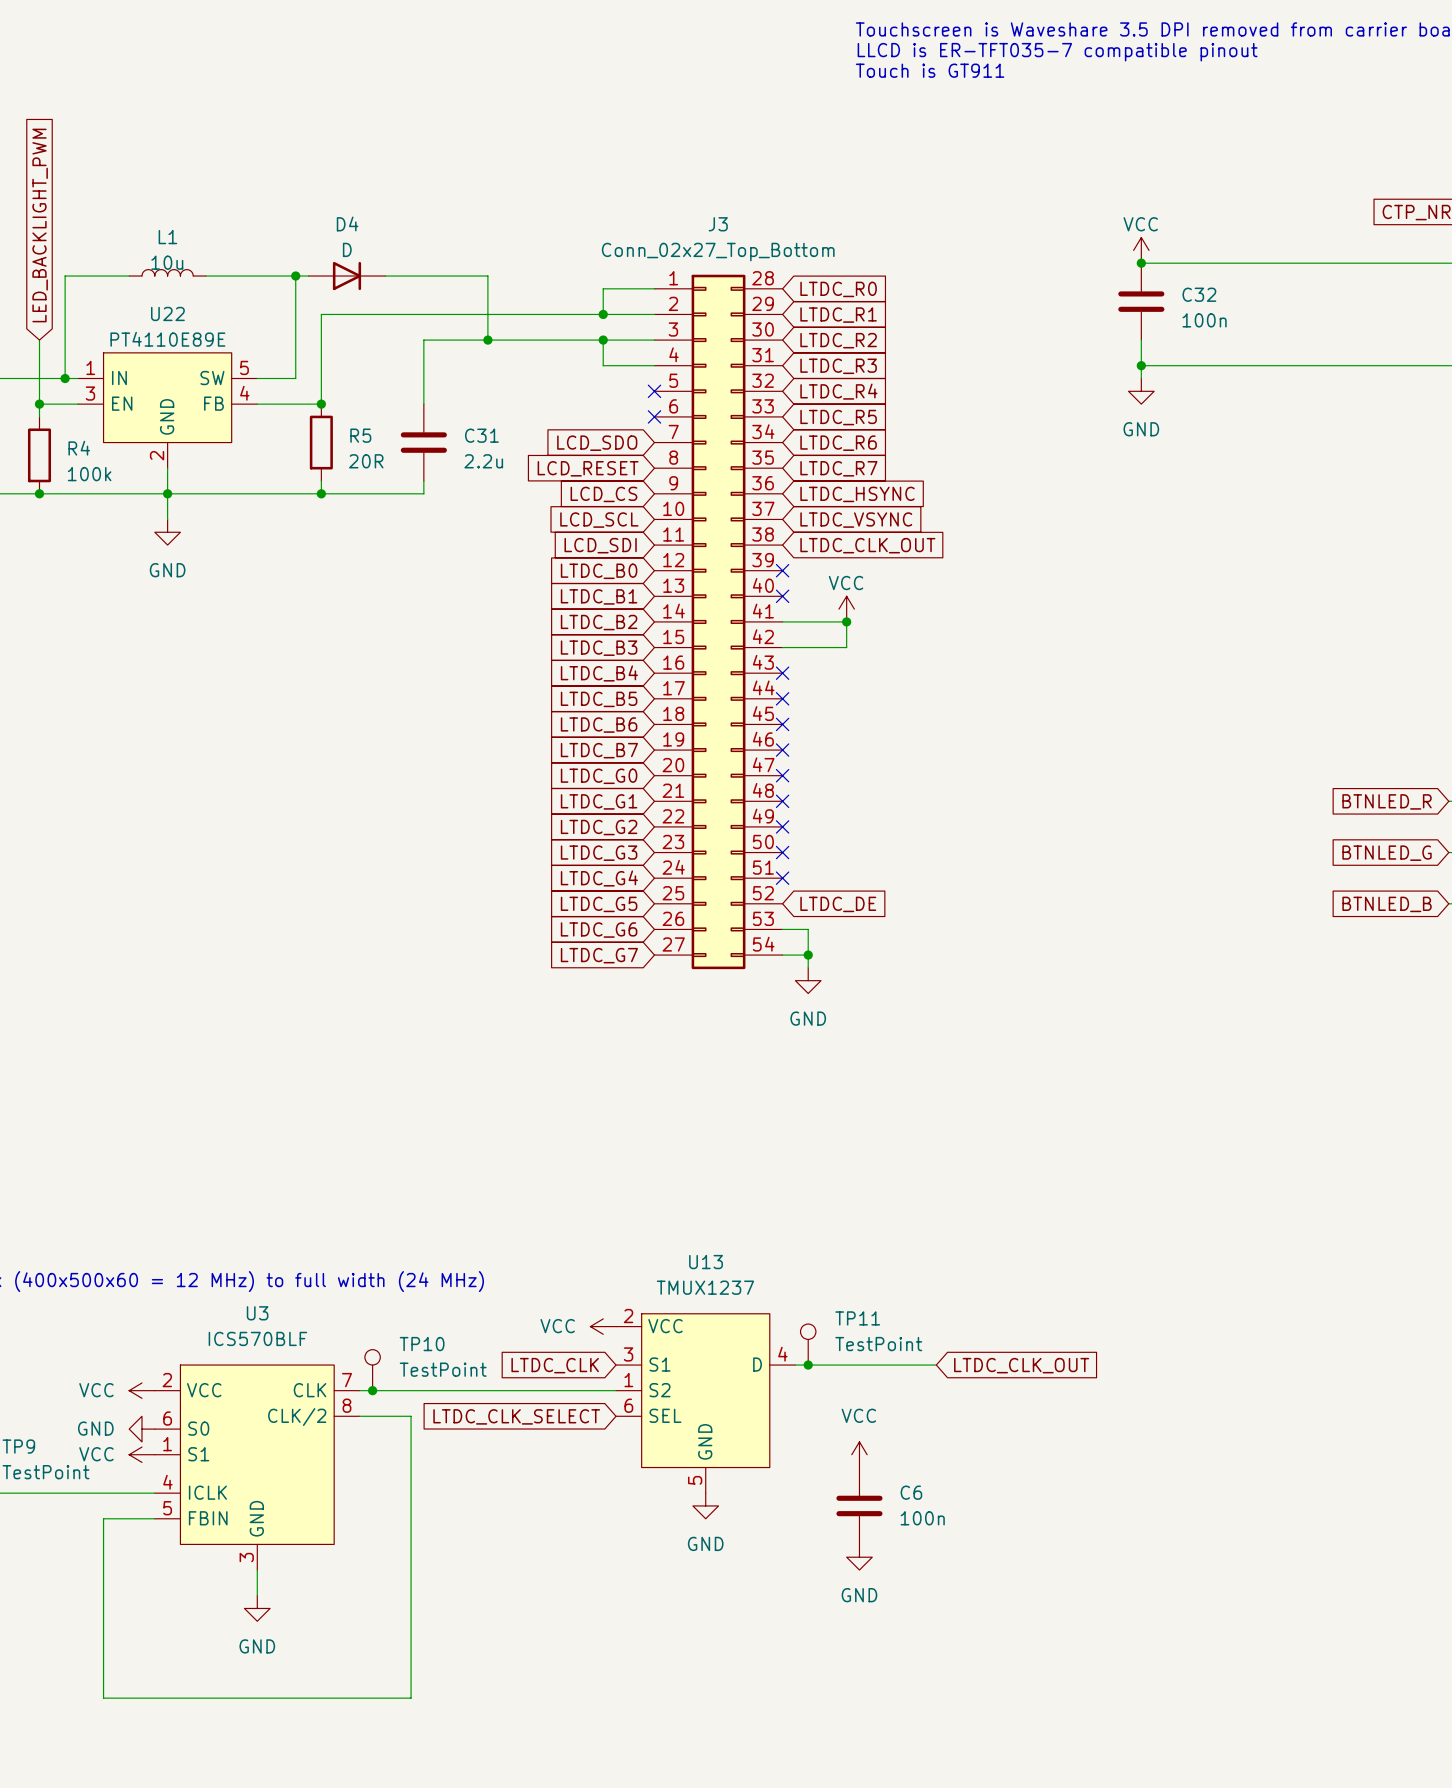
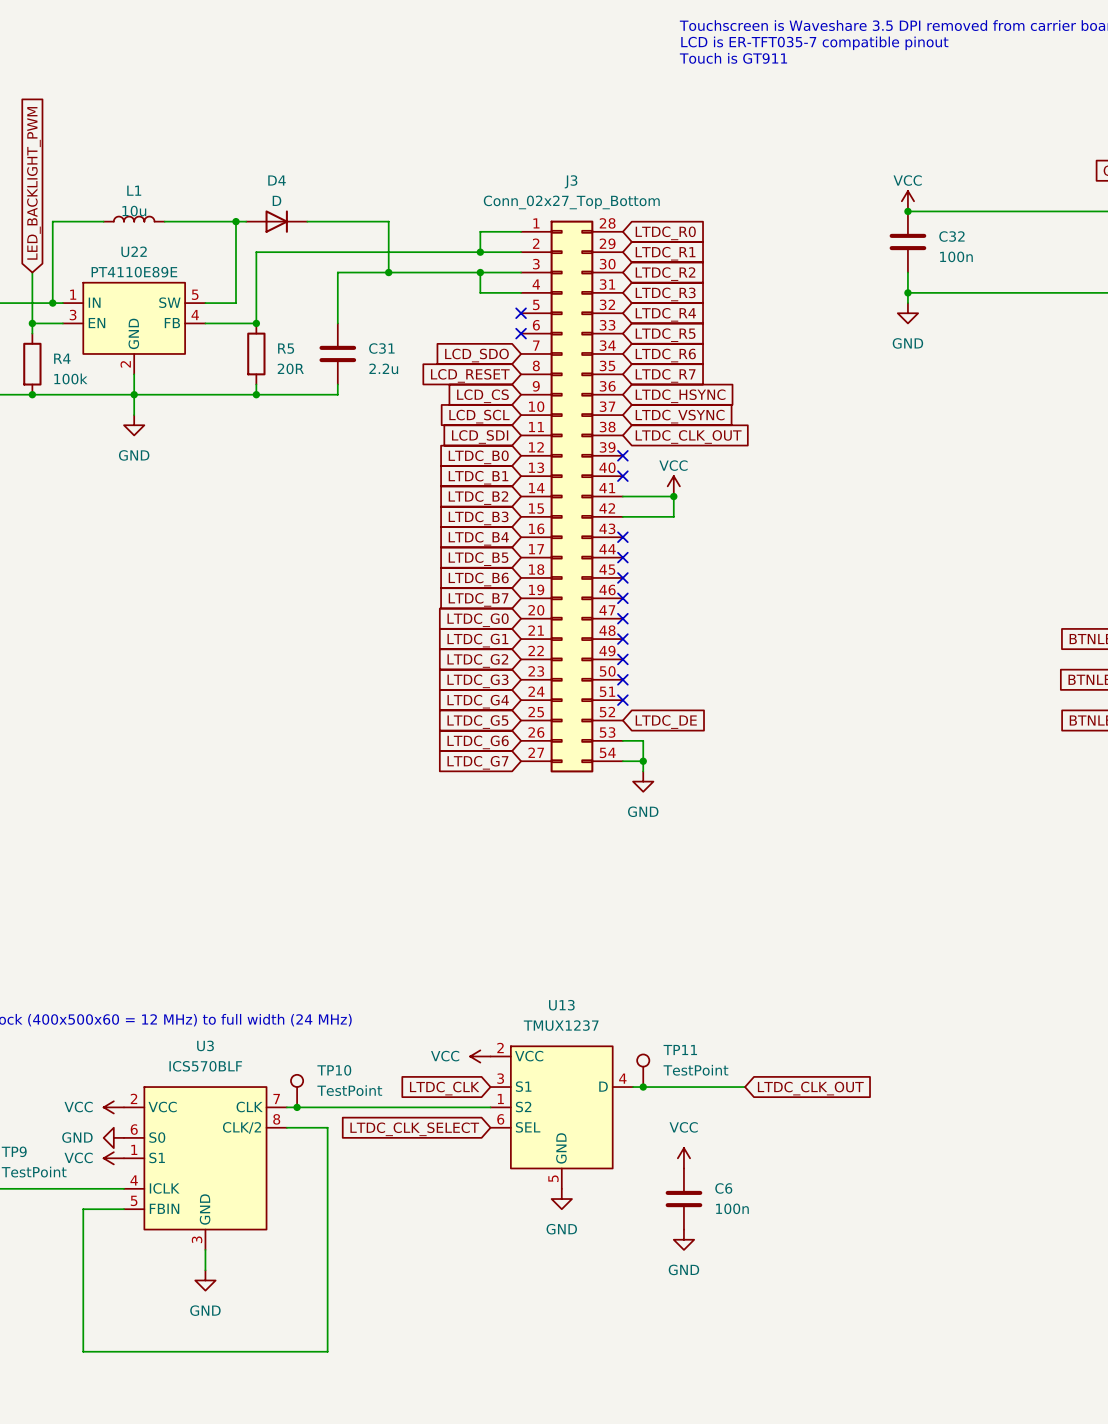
text: LLCD is ER-TFT035-7 compatible pinout (1057, 52) -> LCD is ER-TFT035-7 compatible pinout (814, 43)

